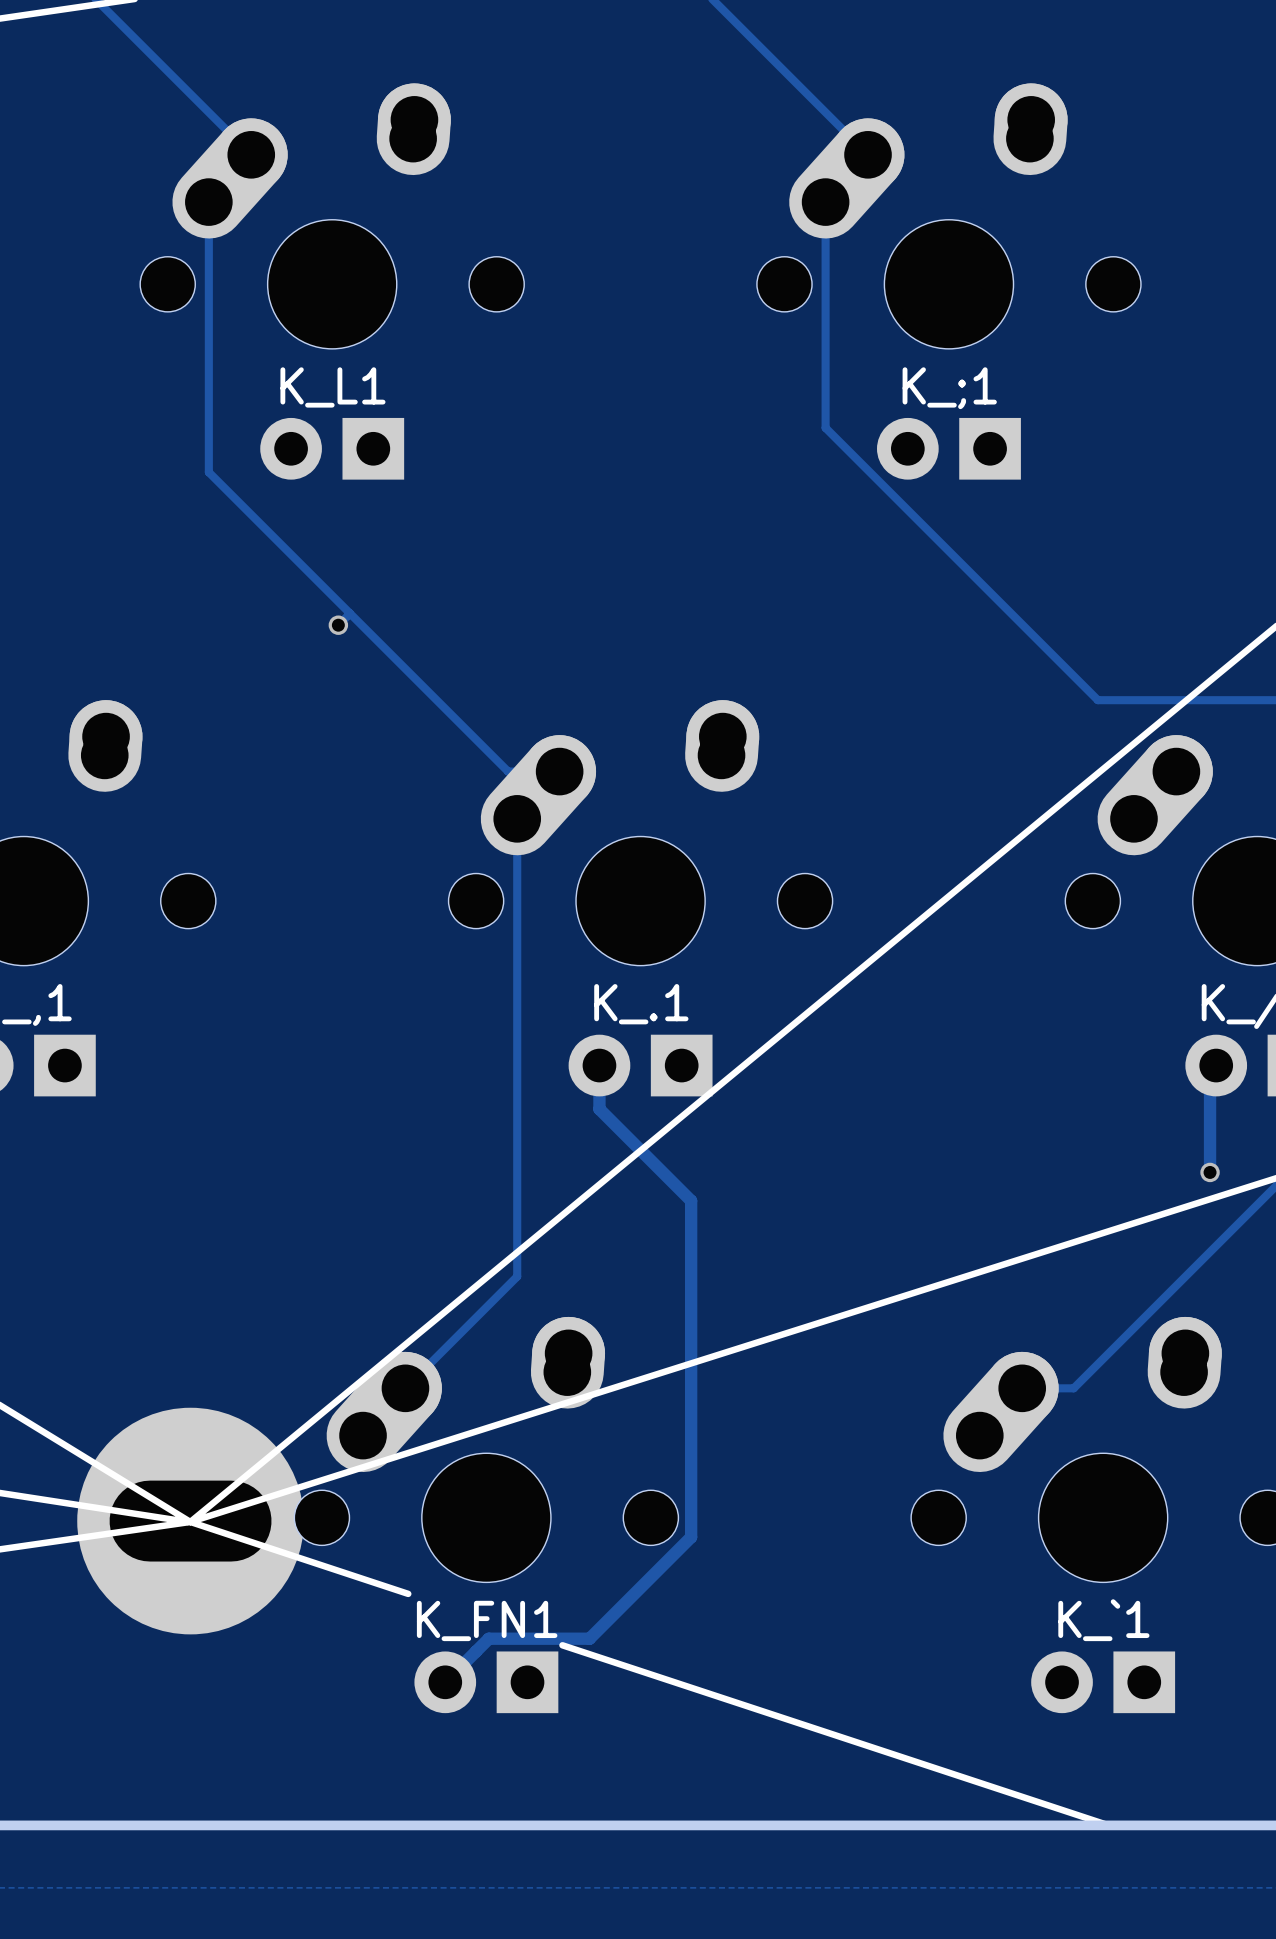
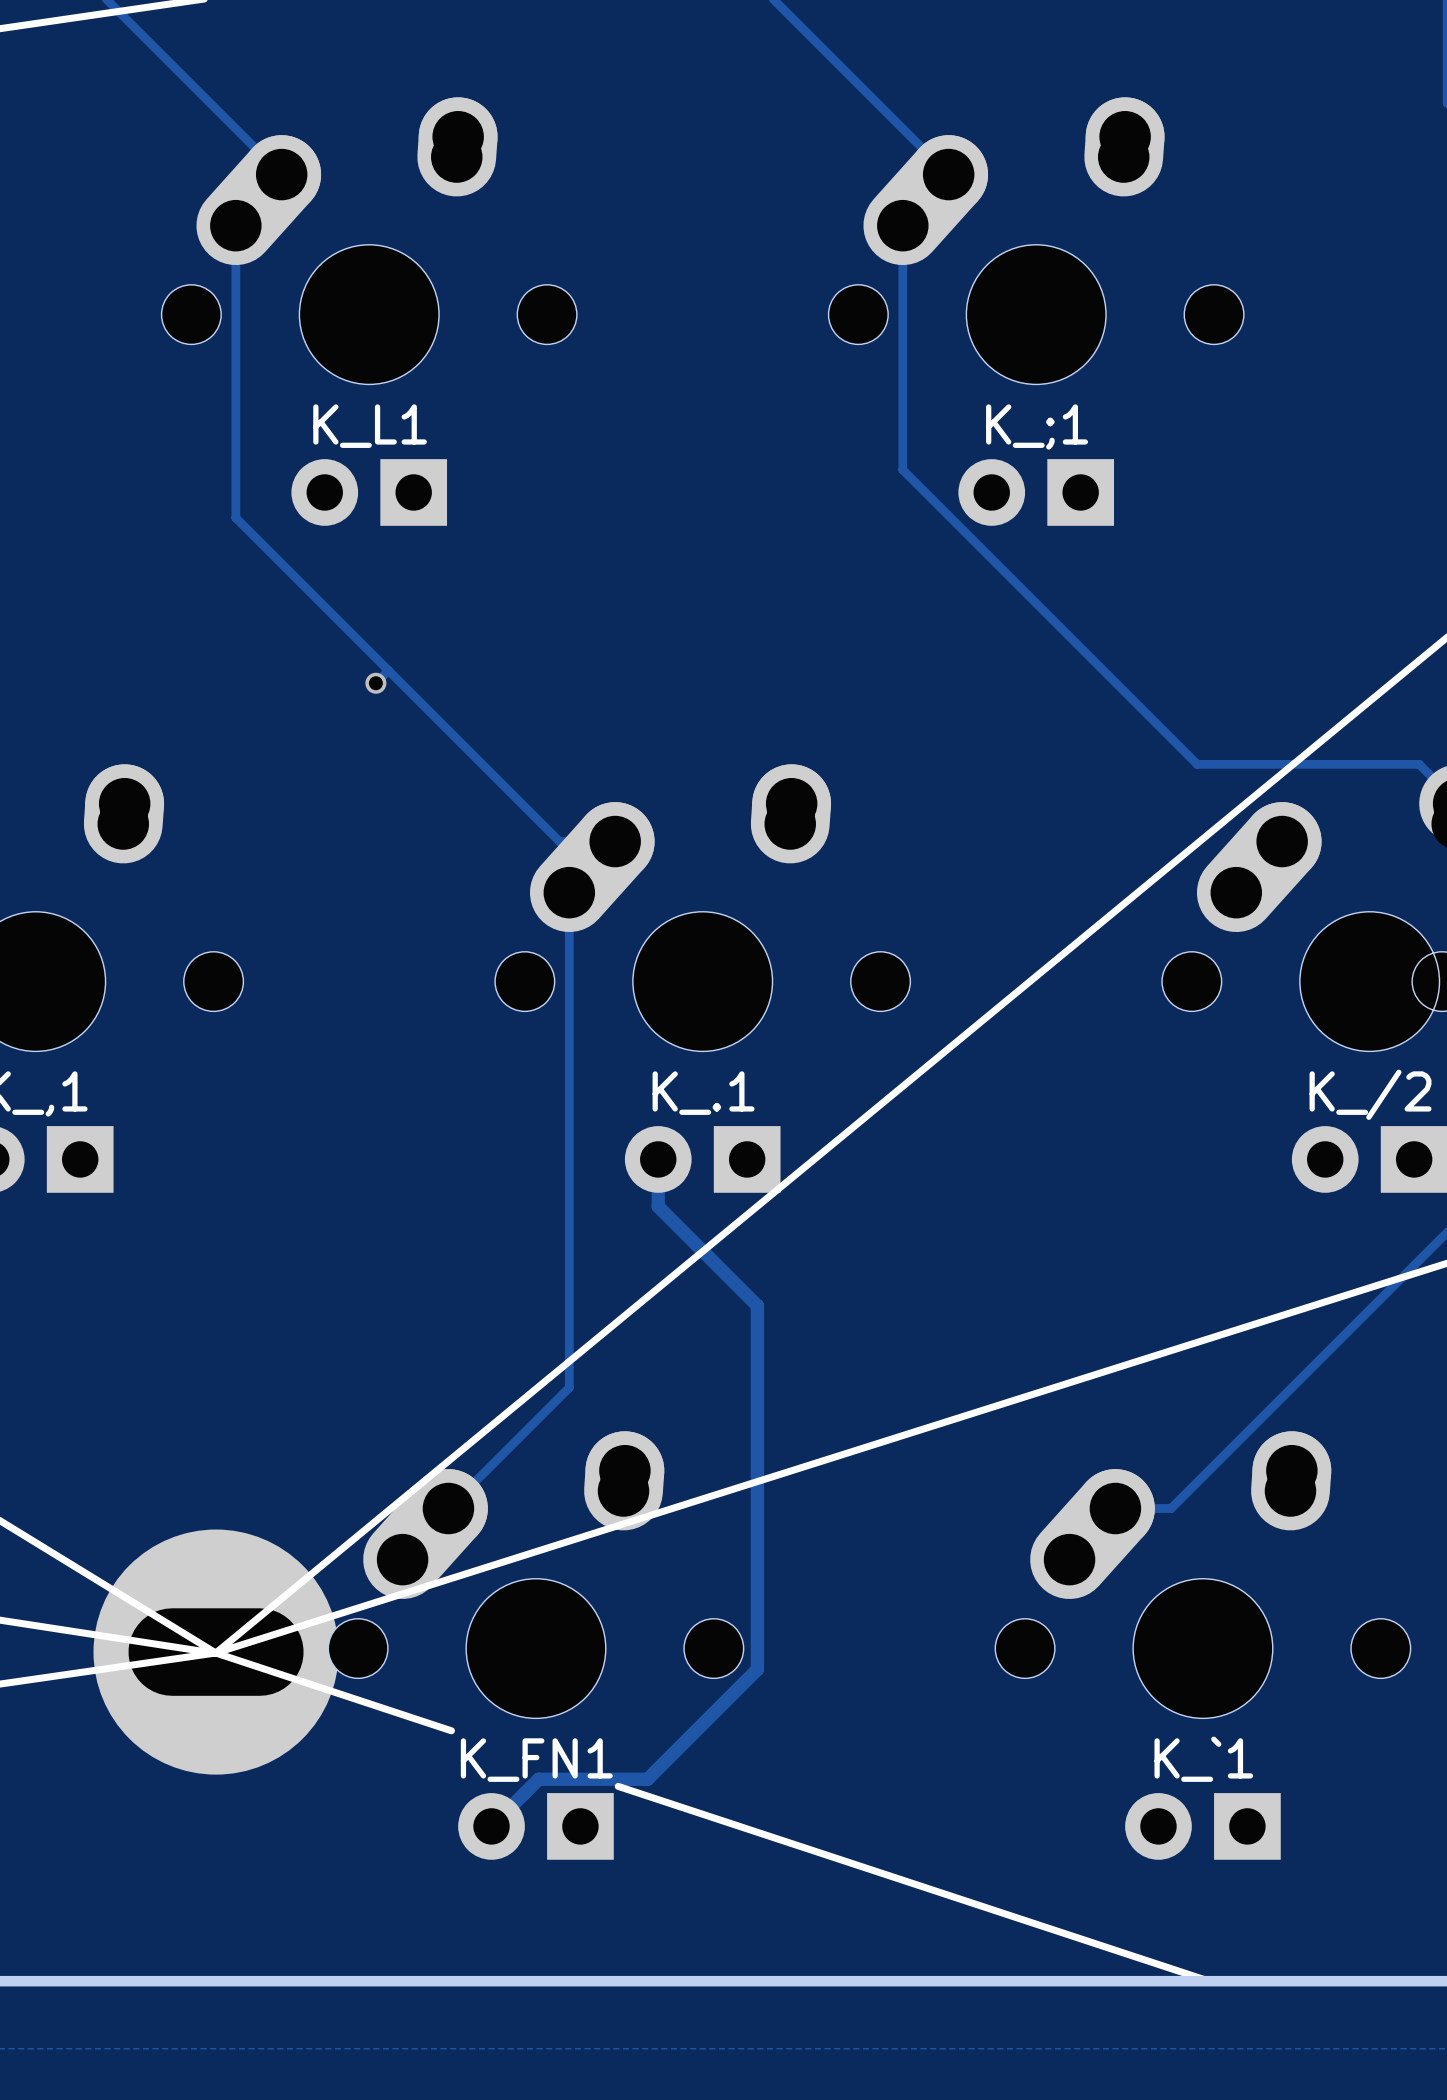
track: (1216, 1065) (1210, 1071) (1210, 1172) -> none
via: (1210, 1172) -> none

